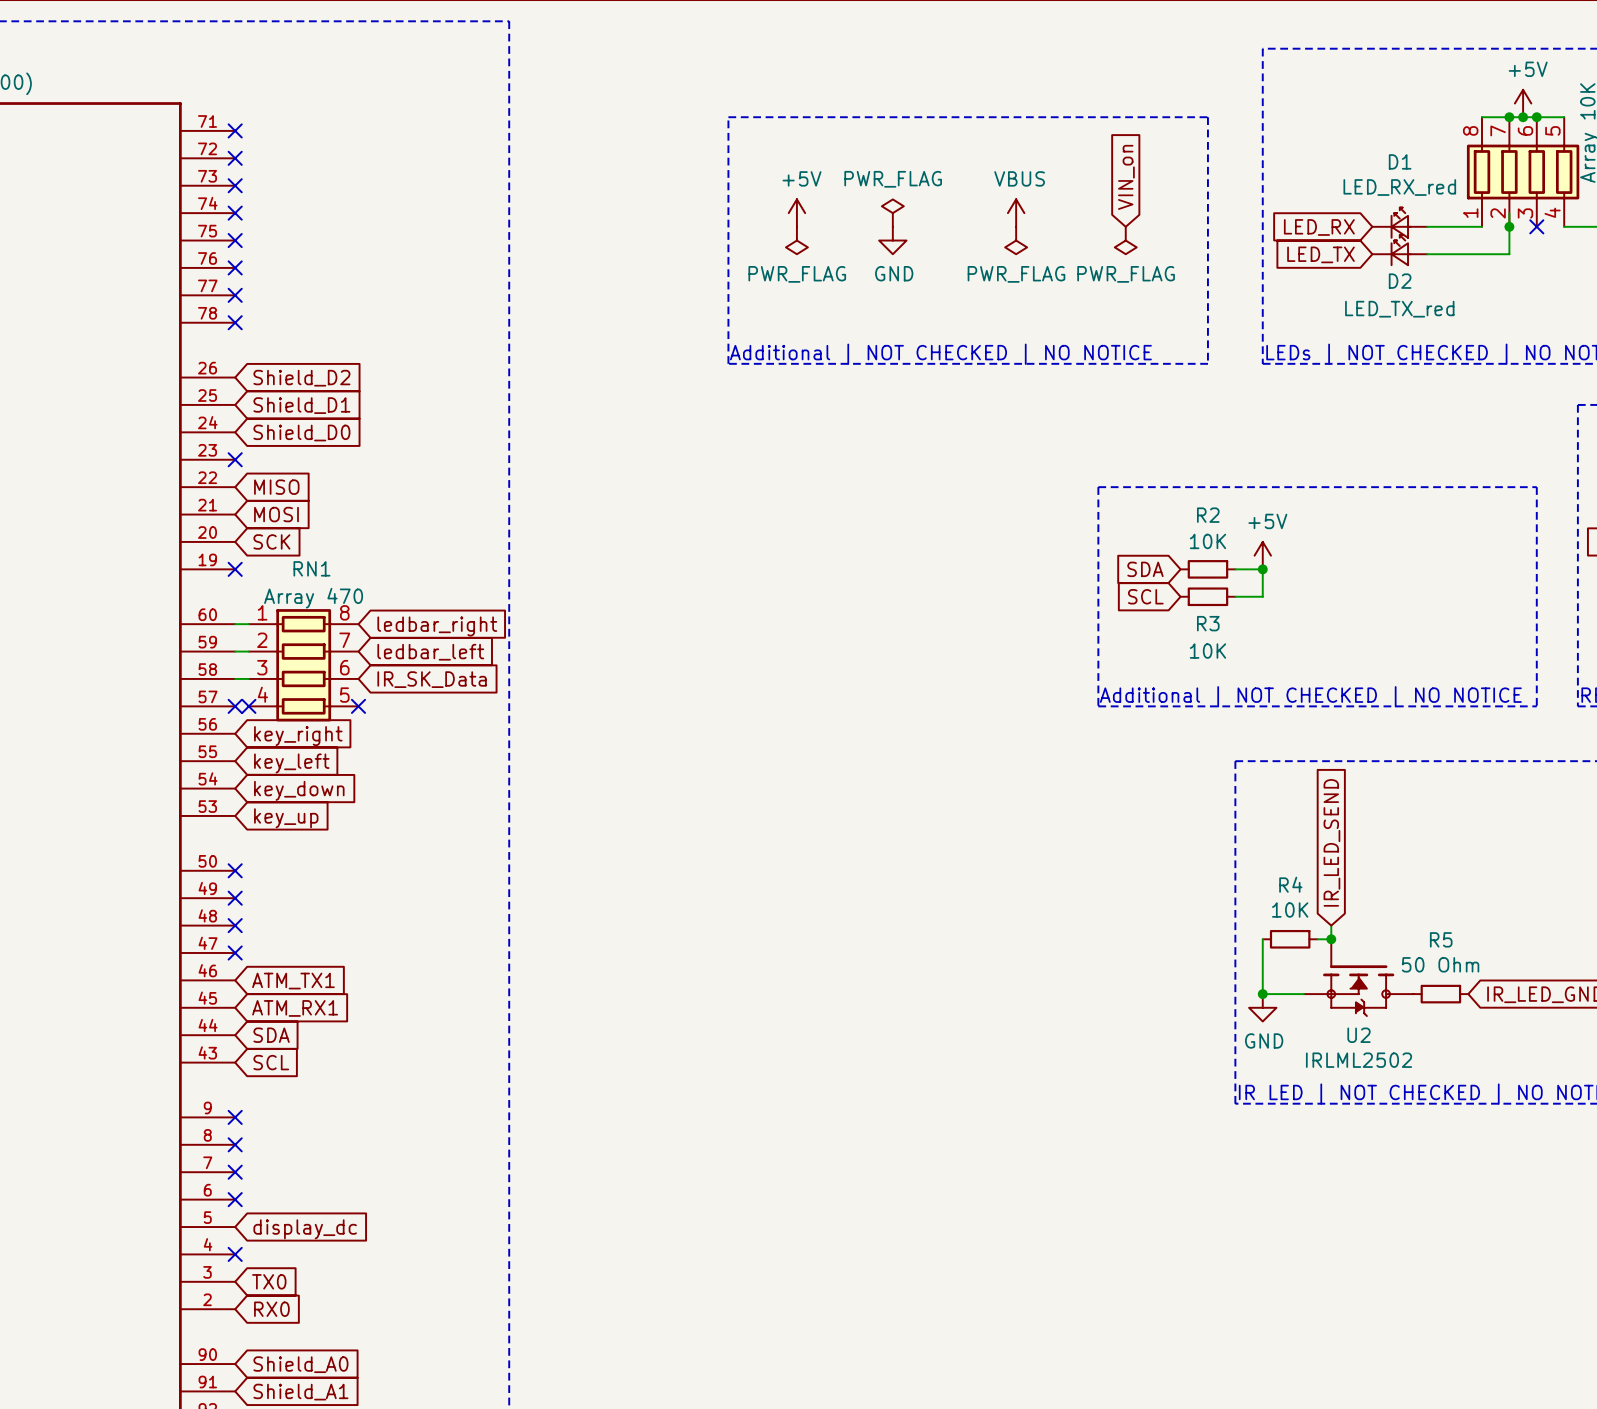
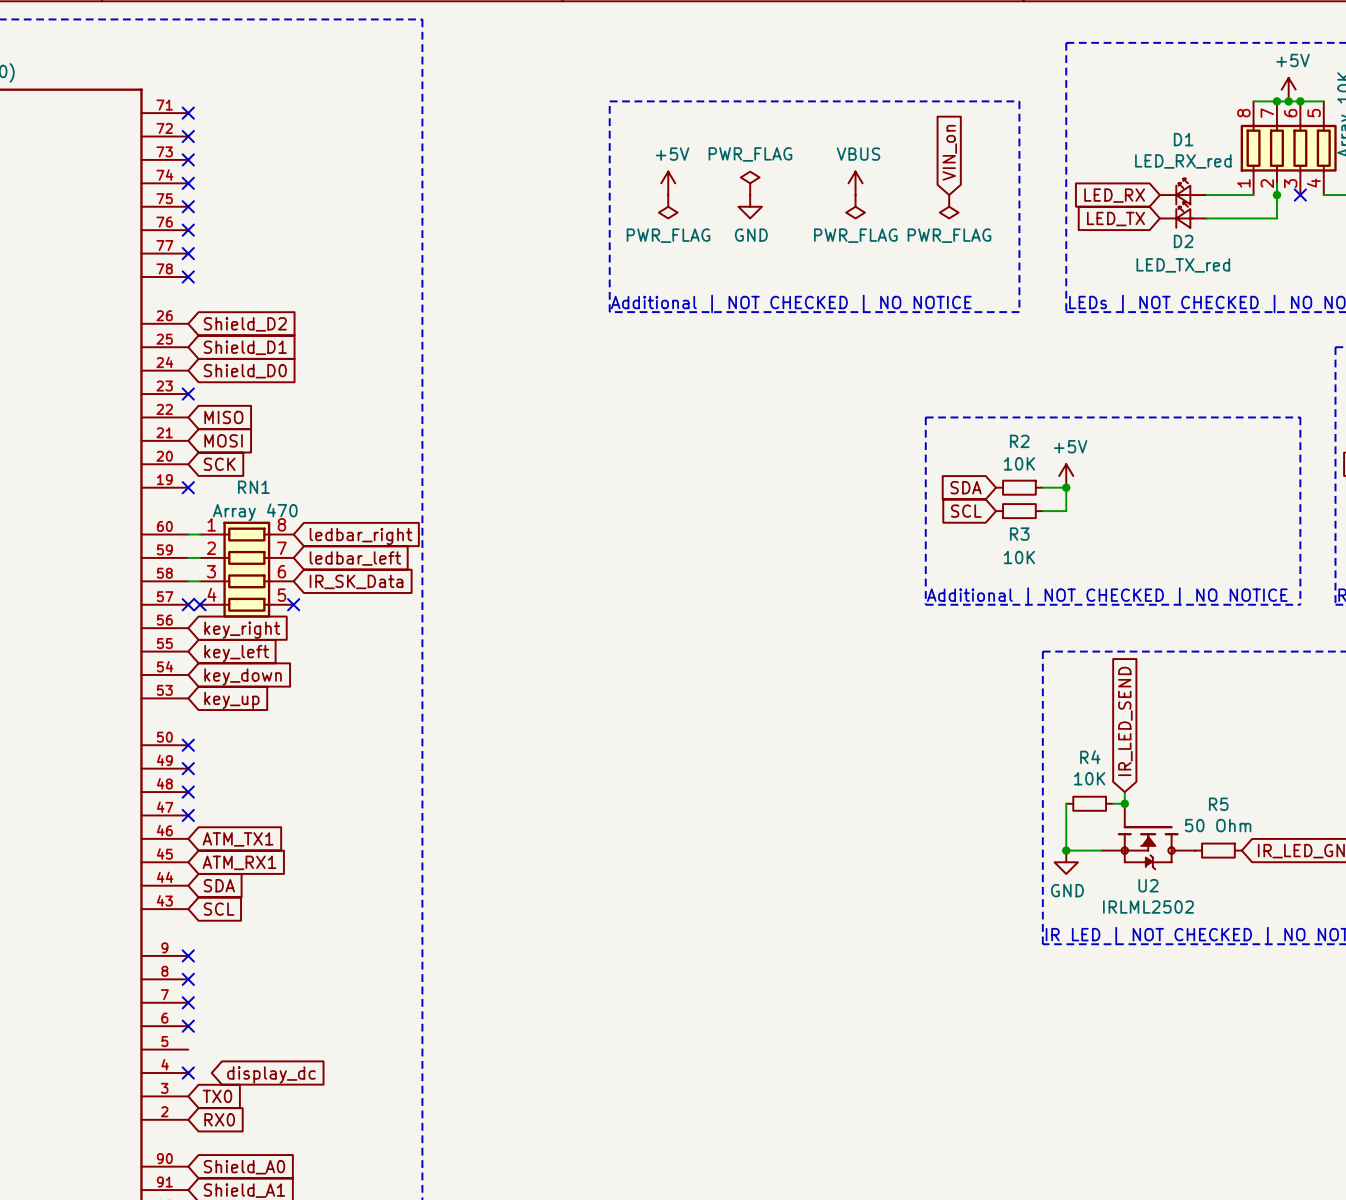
global label position: display_dc (305, 1229) -> display_dc (271, 1074)

